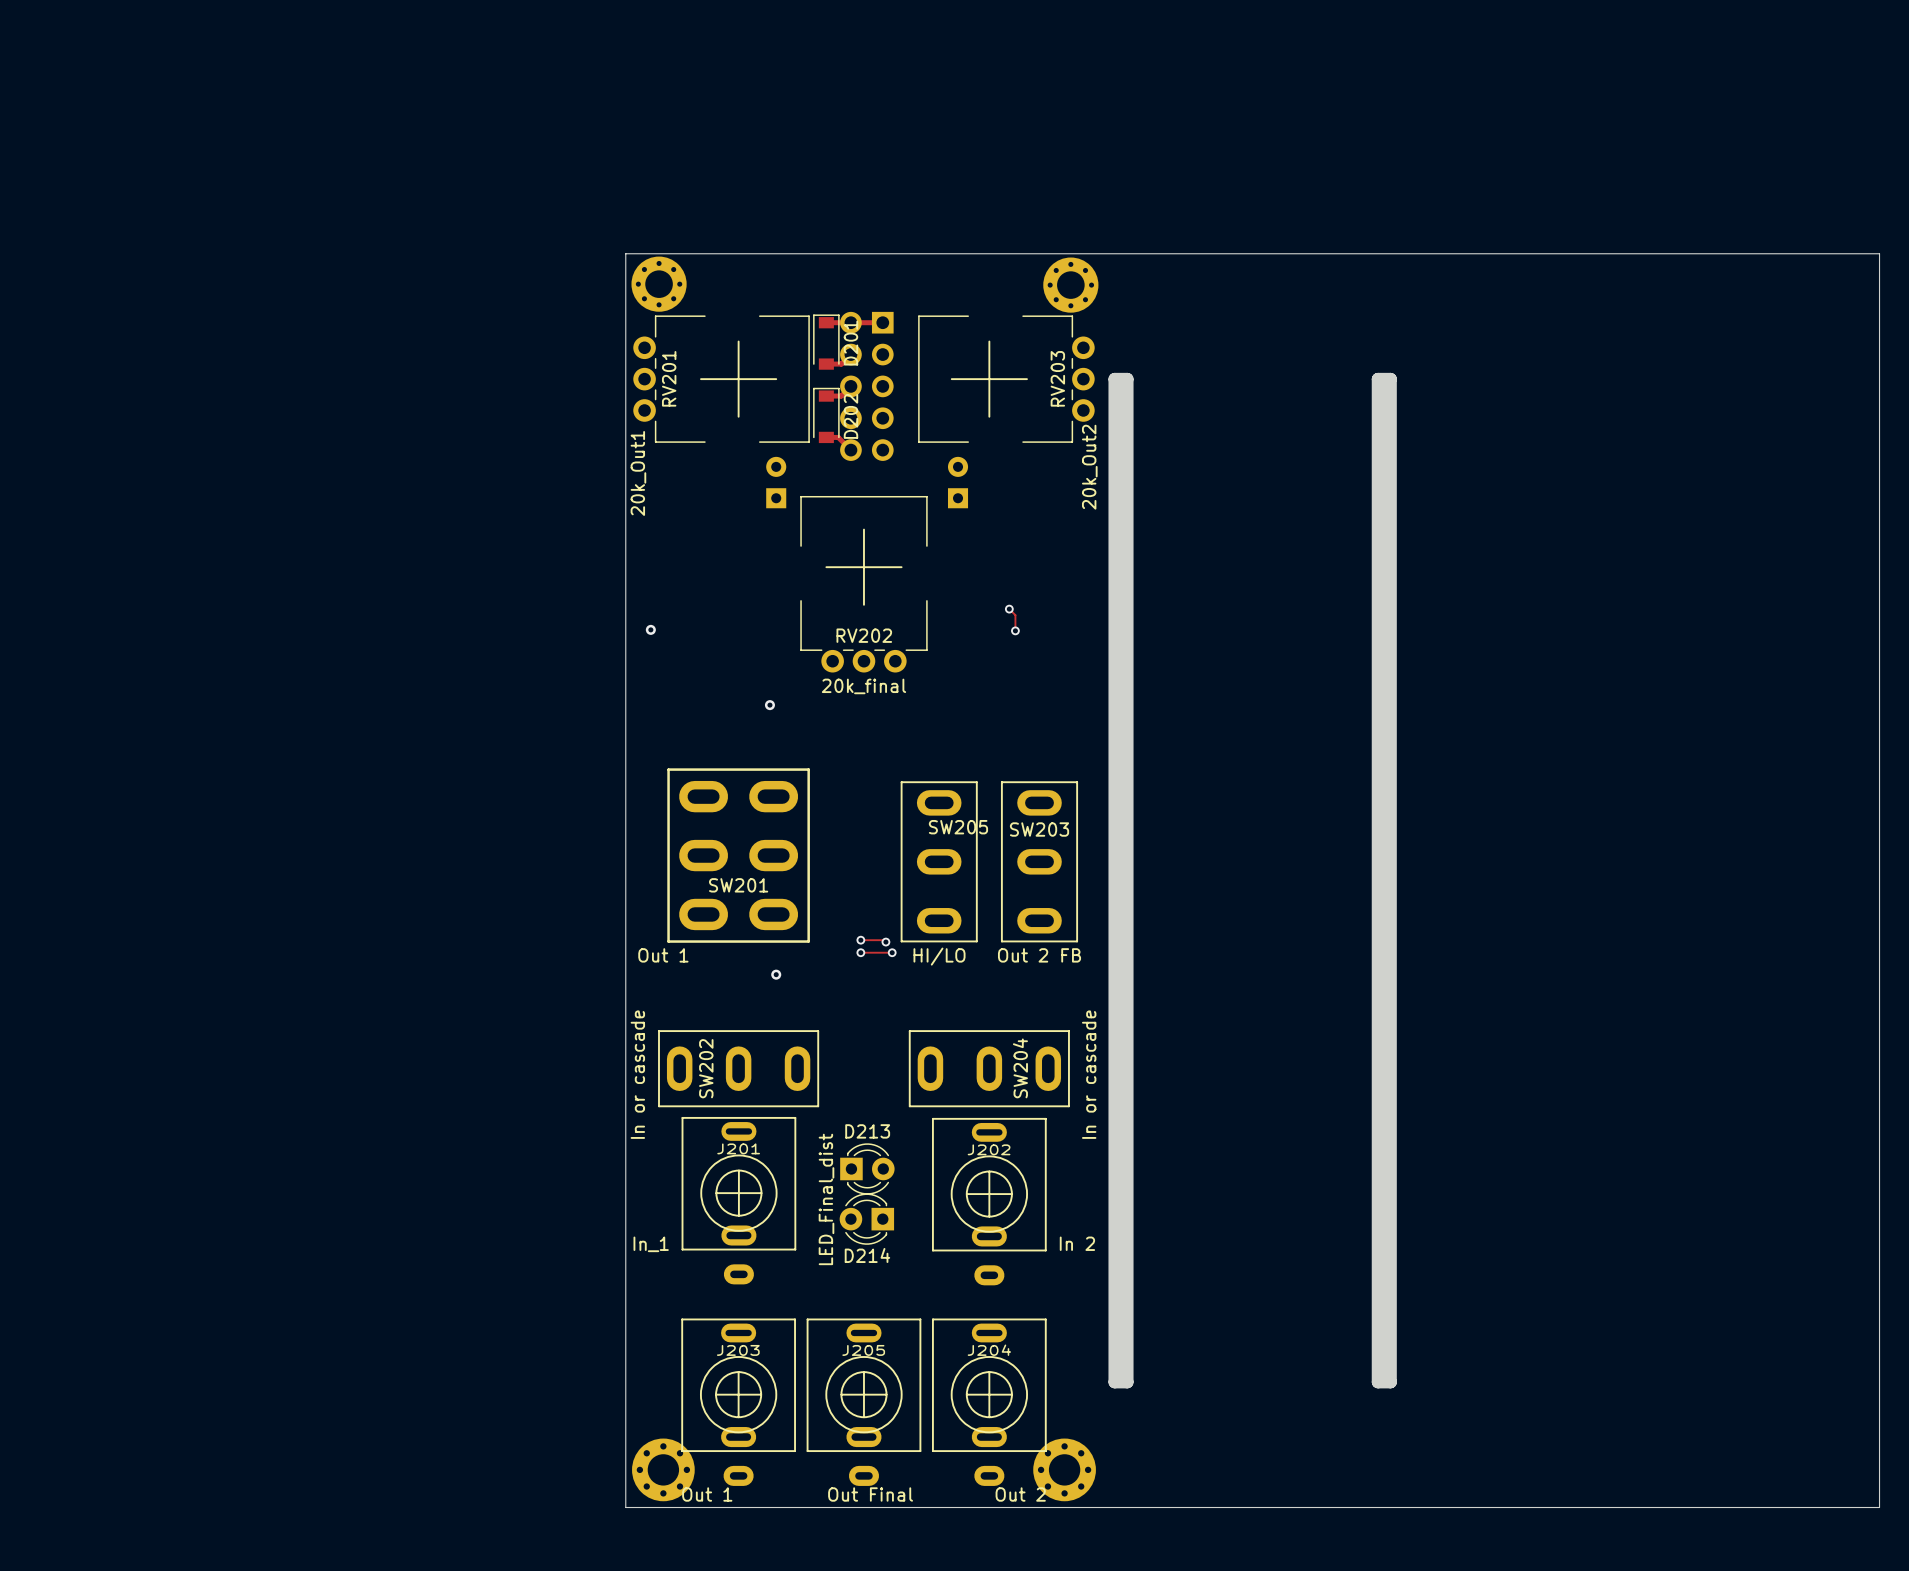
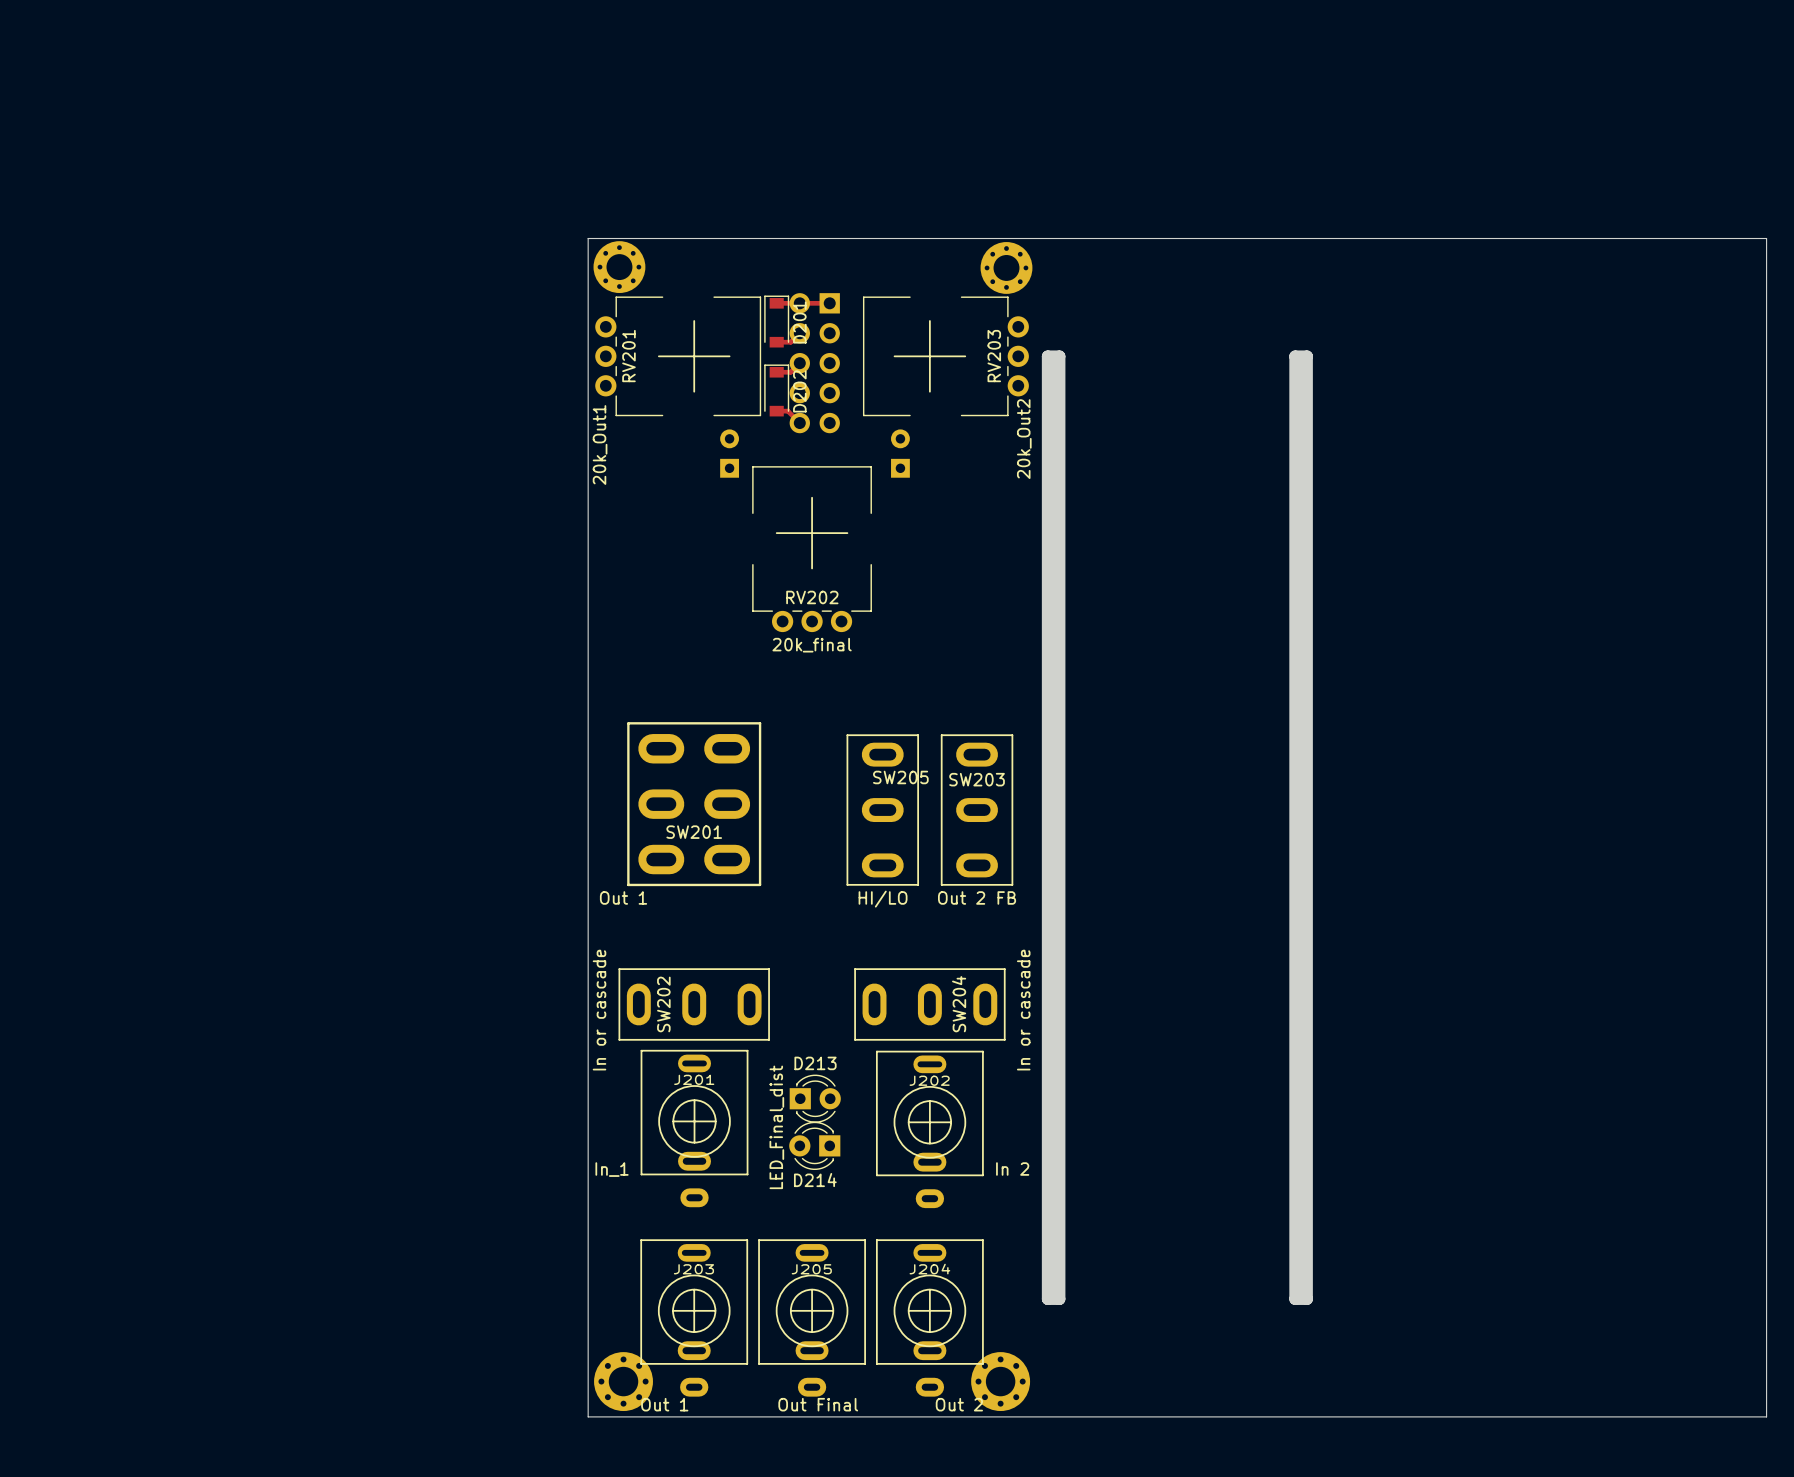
track: (1009, 609) (1015, 615) (1015, 630) -> none
via: (1009, 609) -> none
via: (650, 629) -> none
via: (1015, 630) -> none
via: (769, 705) -> none
track: (860, 940) (884, 940) (885, 942) -> none
via: (860, 940) -> none
via: (885, 942) -> none
track: (860, 952) (892, 952) -> none
via: (860, 952) -> none
via: (892, 952) -> none
via: (776, 974) -> none

